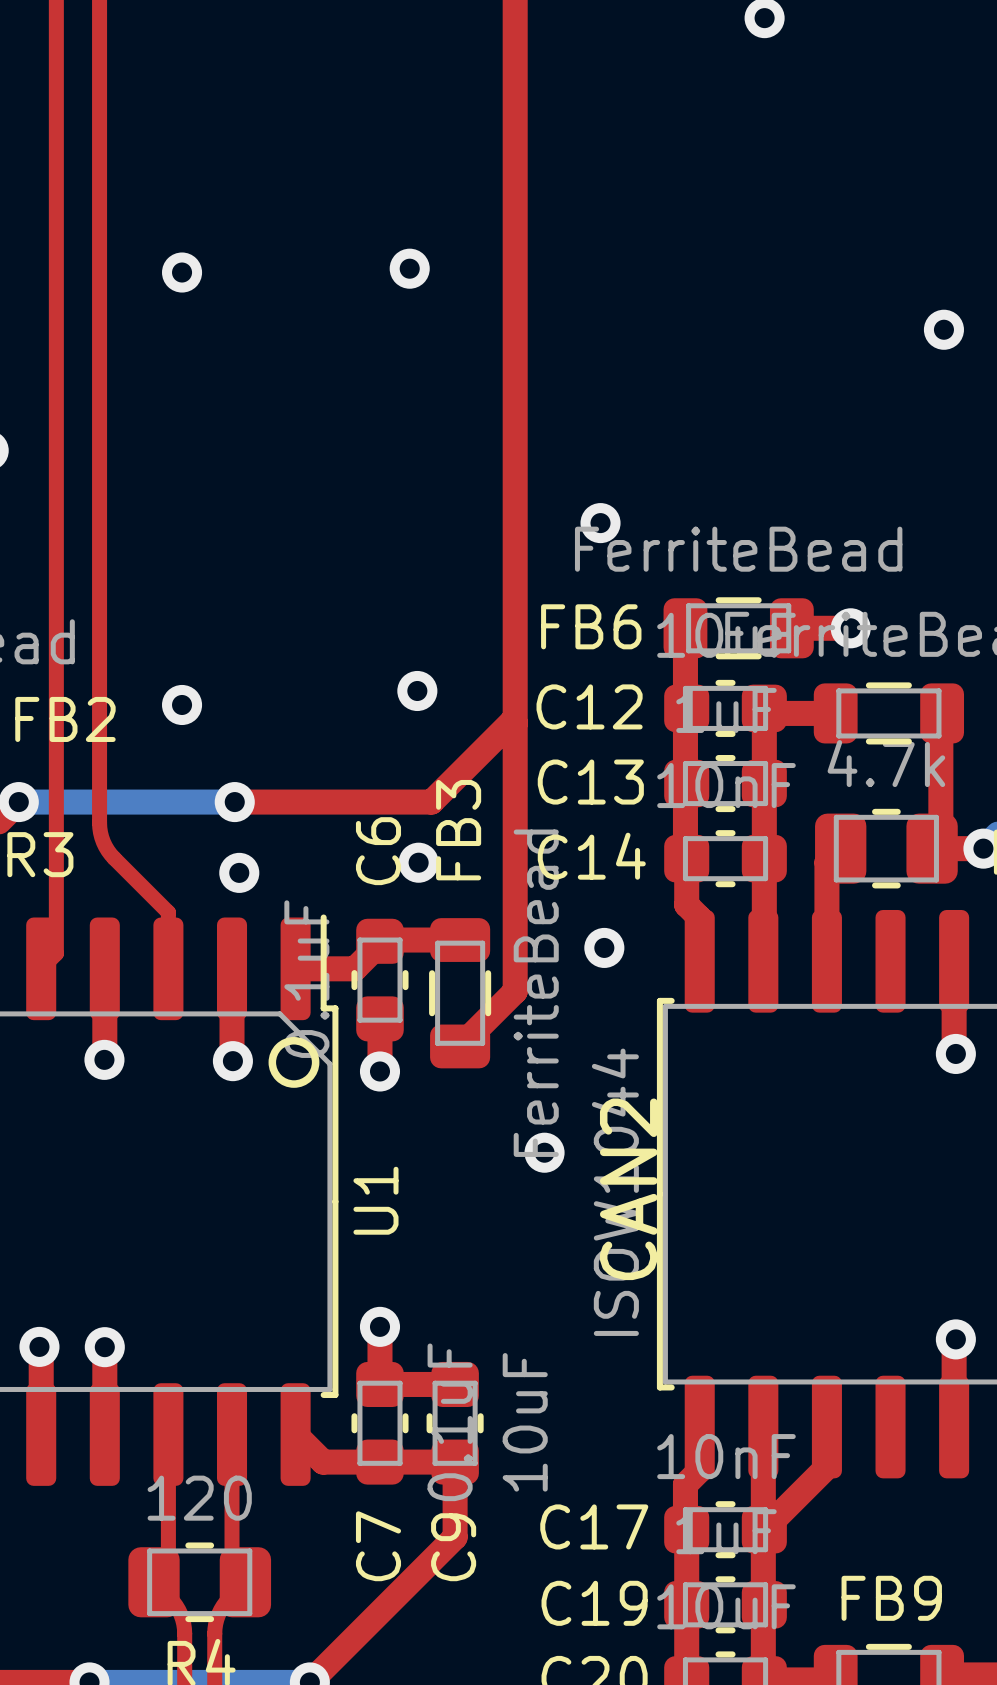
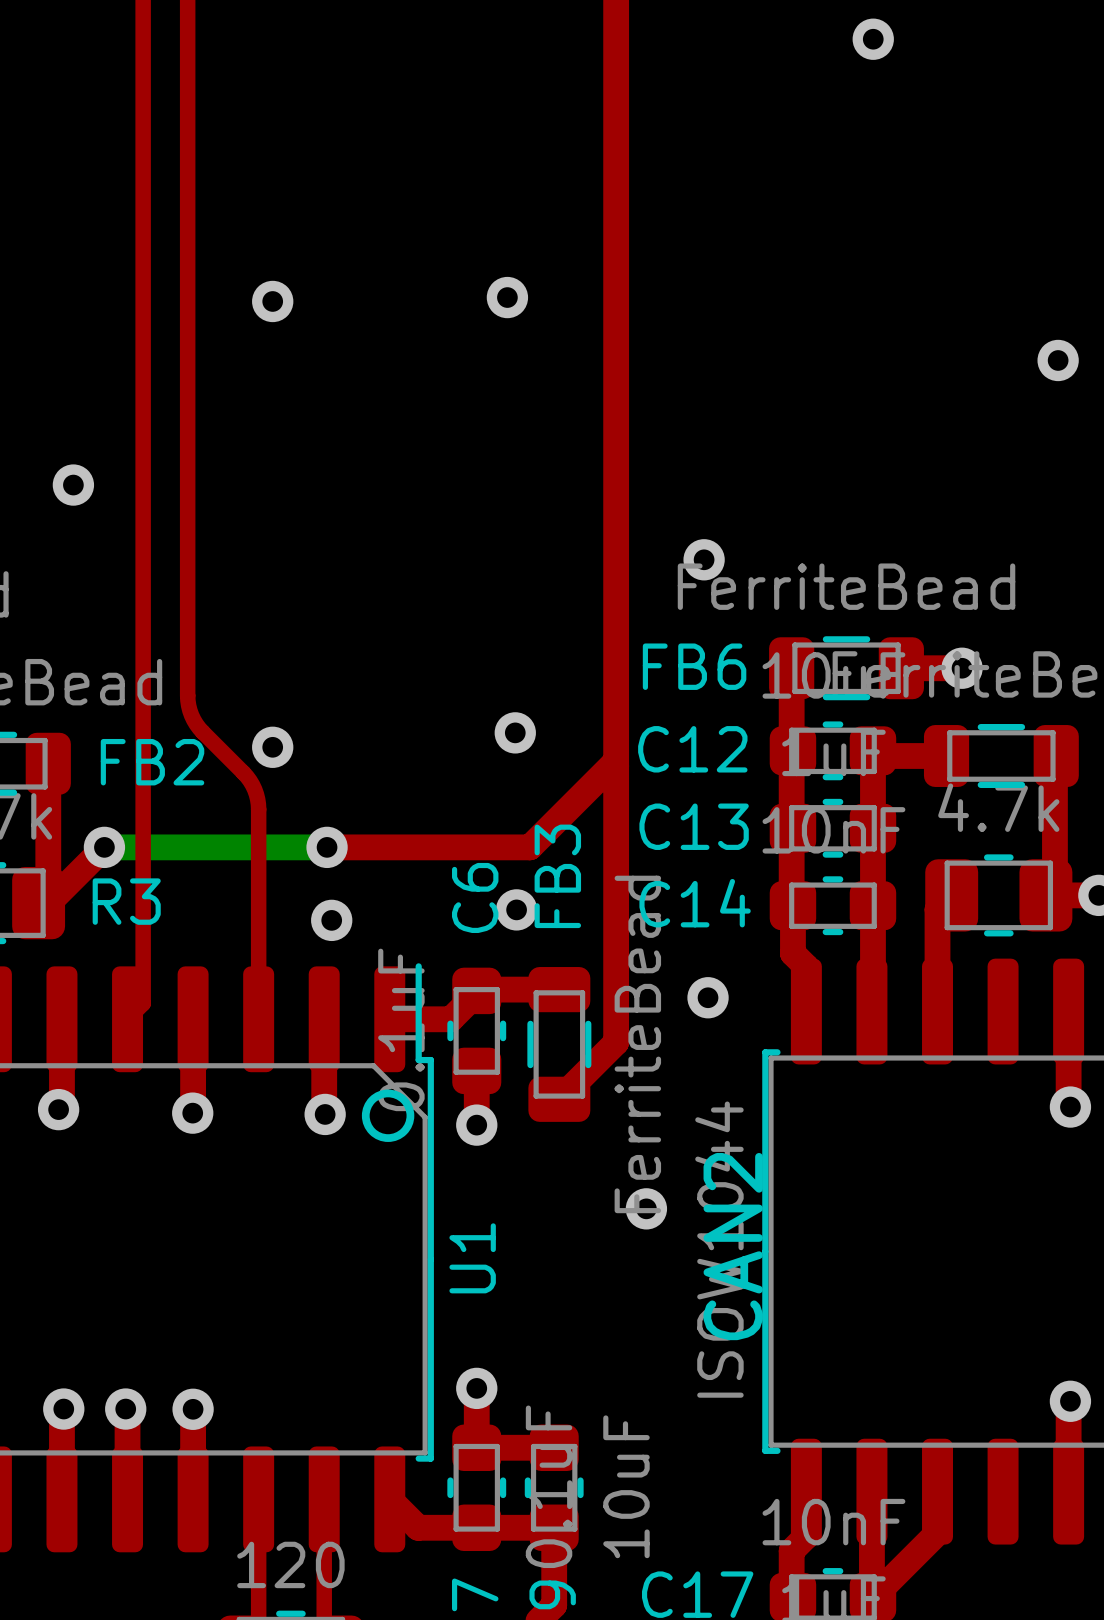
top track: (99, 654) (99, 822) (101, 837) (110, 854) (168, 912) -> (187, 695) (189, 710) (196, 724) (246, 776) (256, 794) (258, 809) (258, 961)

